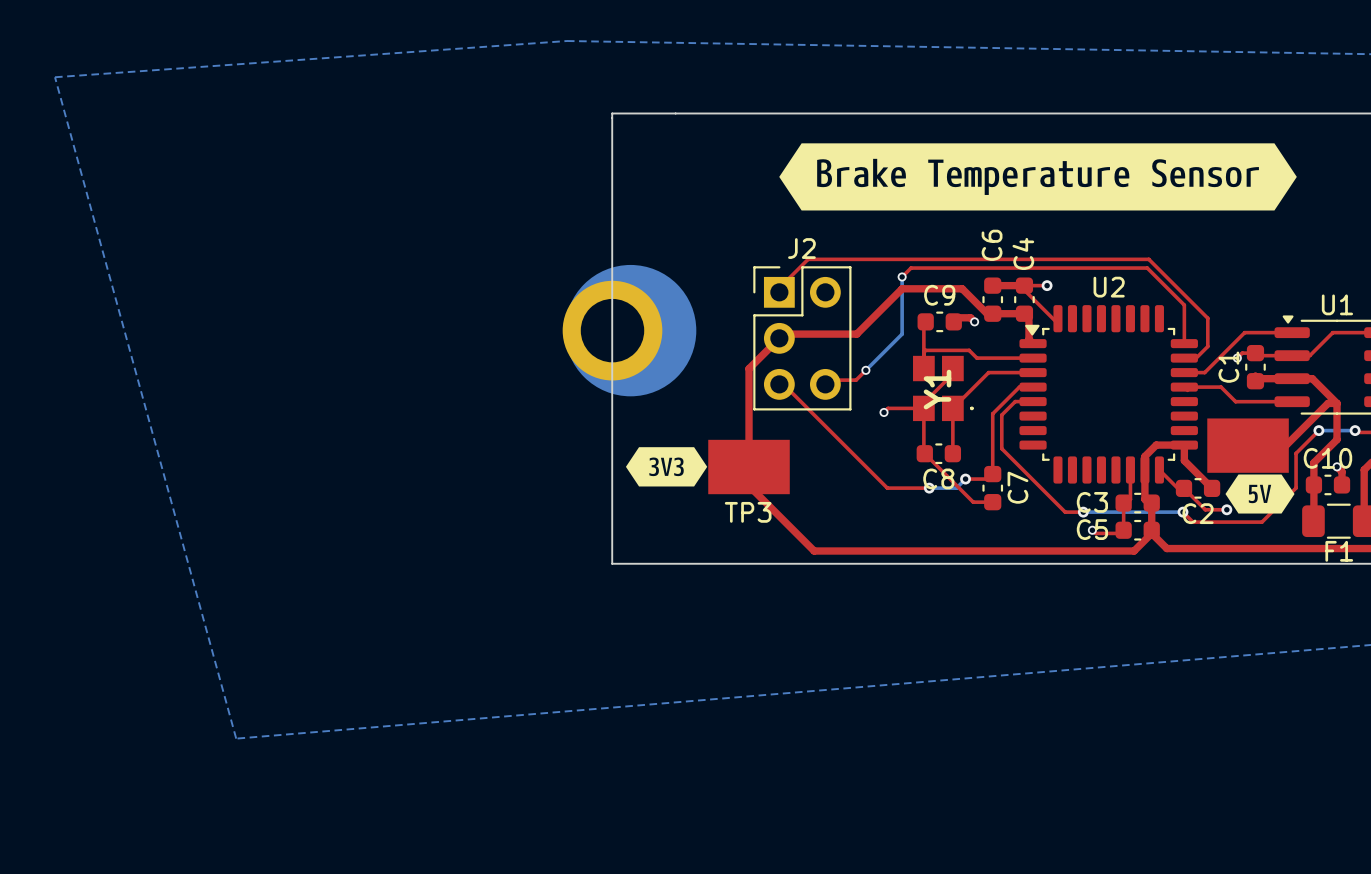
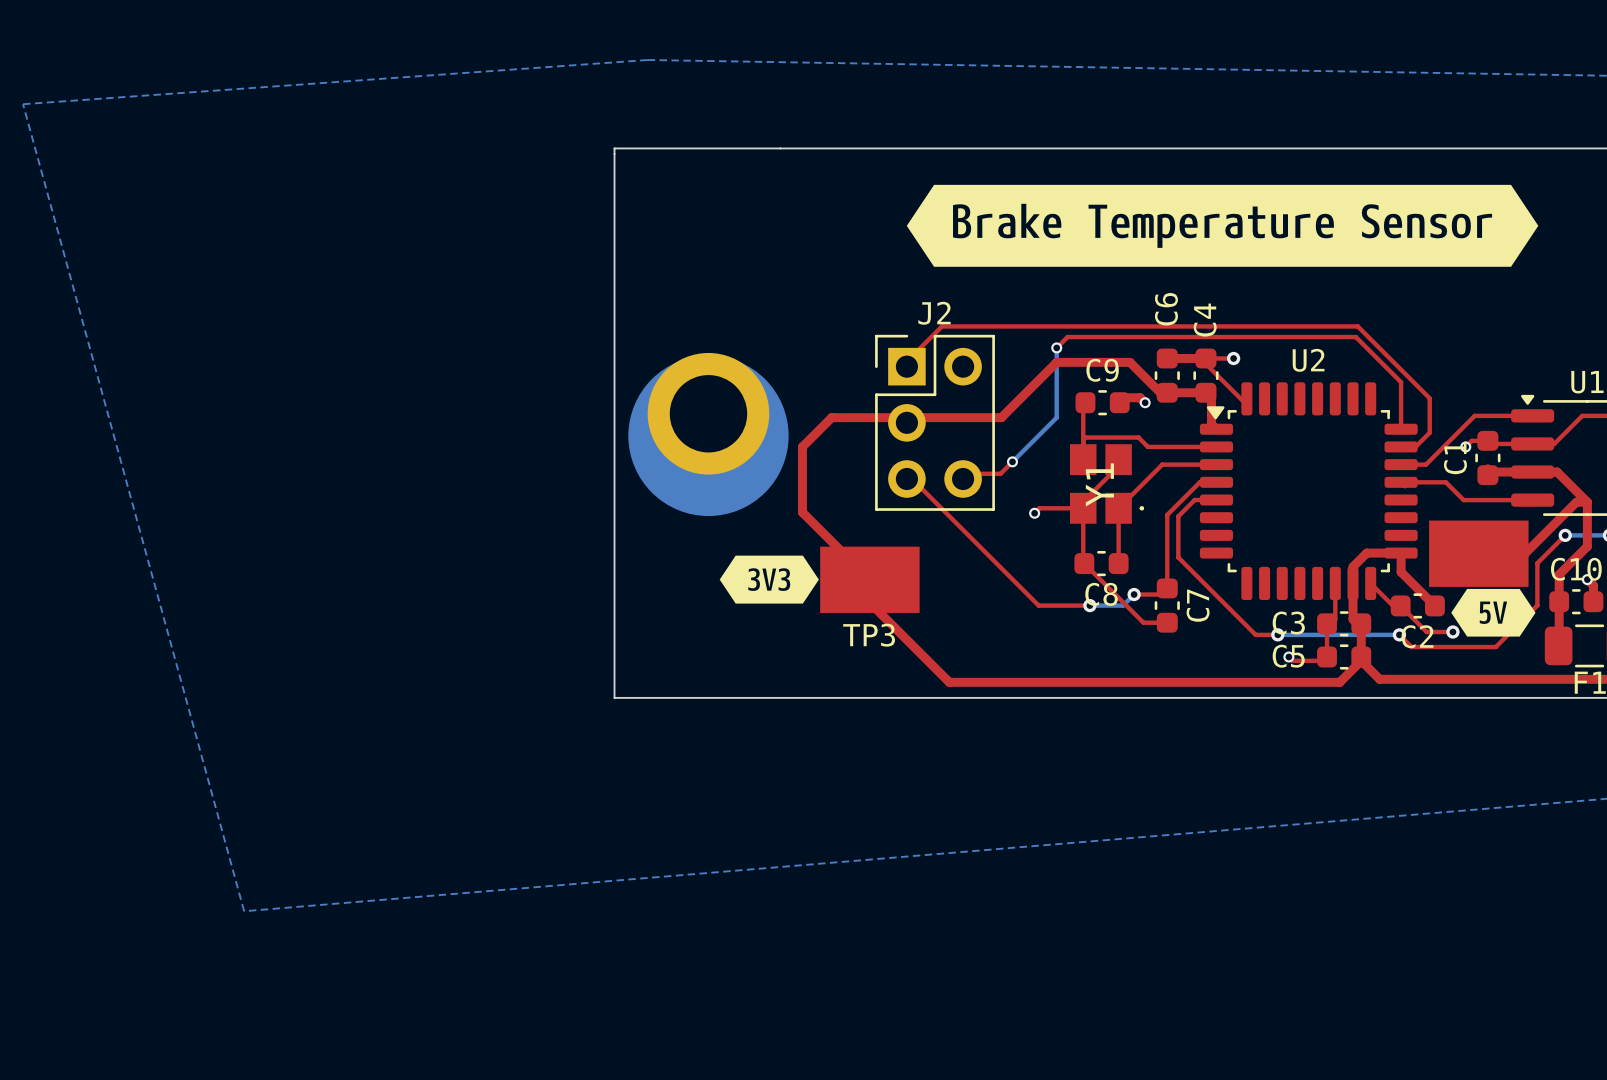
board edge: (612, 113) (612, 563) -> (702, 148) (614, 148) (614, 697) (702, 697)
part rotation: 0° (629, 330) -> 90° clockwise (708, 434)
top track: (783, 334) (749, 368) (749, 467) -> (912, 417) (831, 417) (802, 446) (802, 512) (869, 579)

